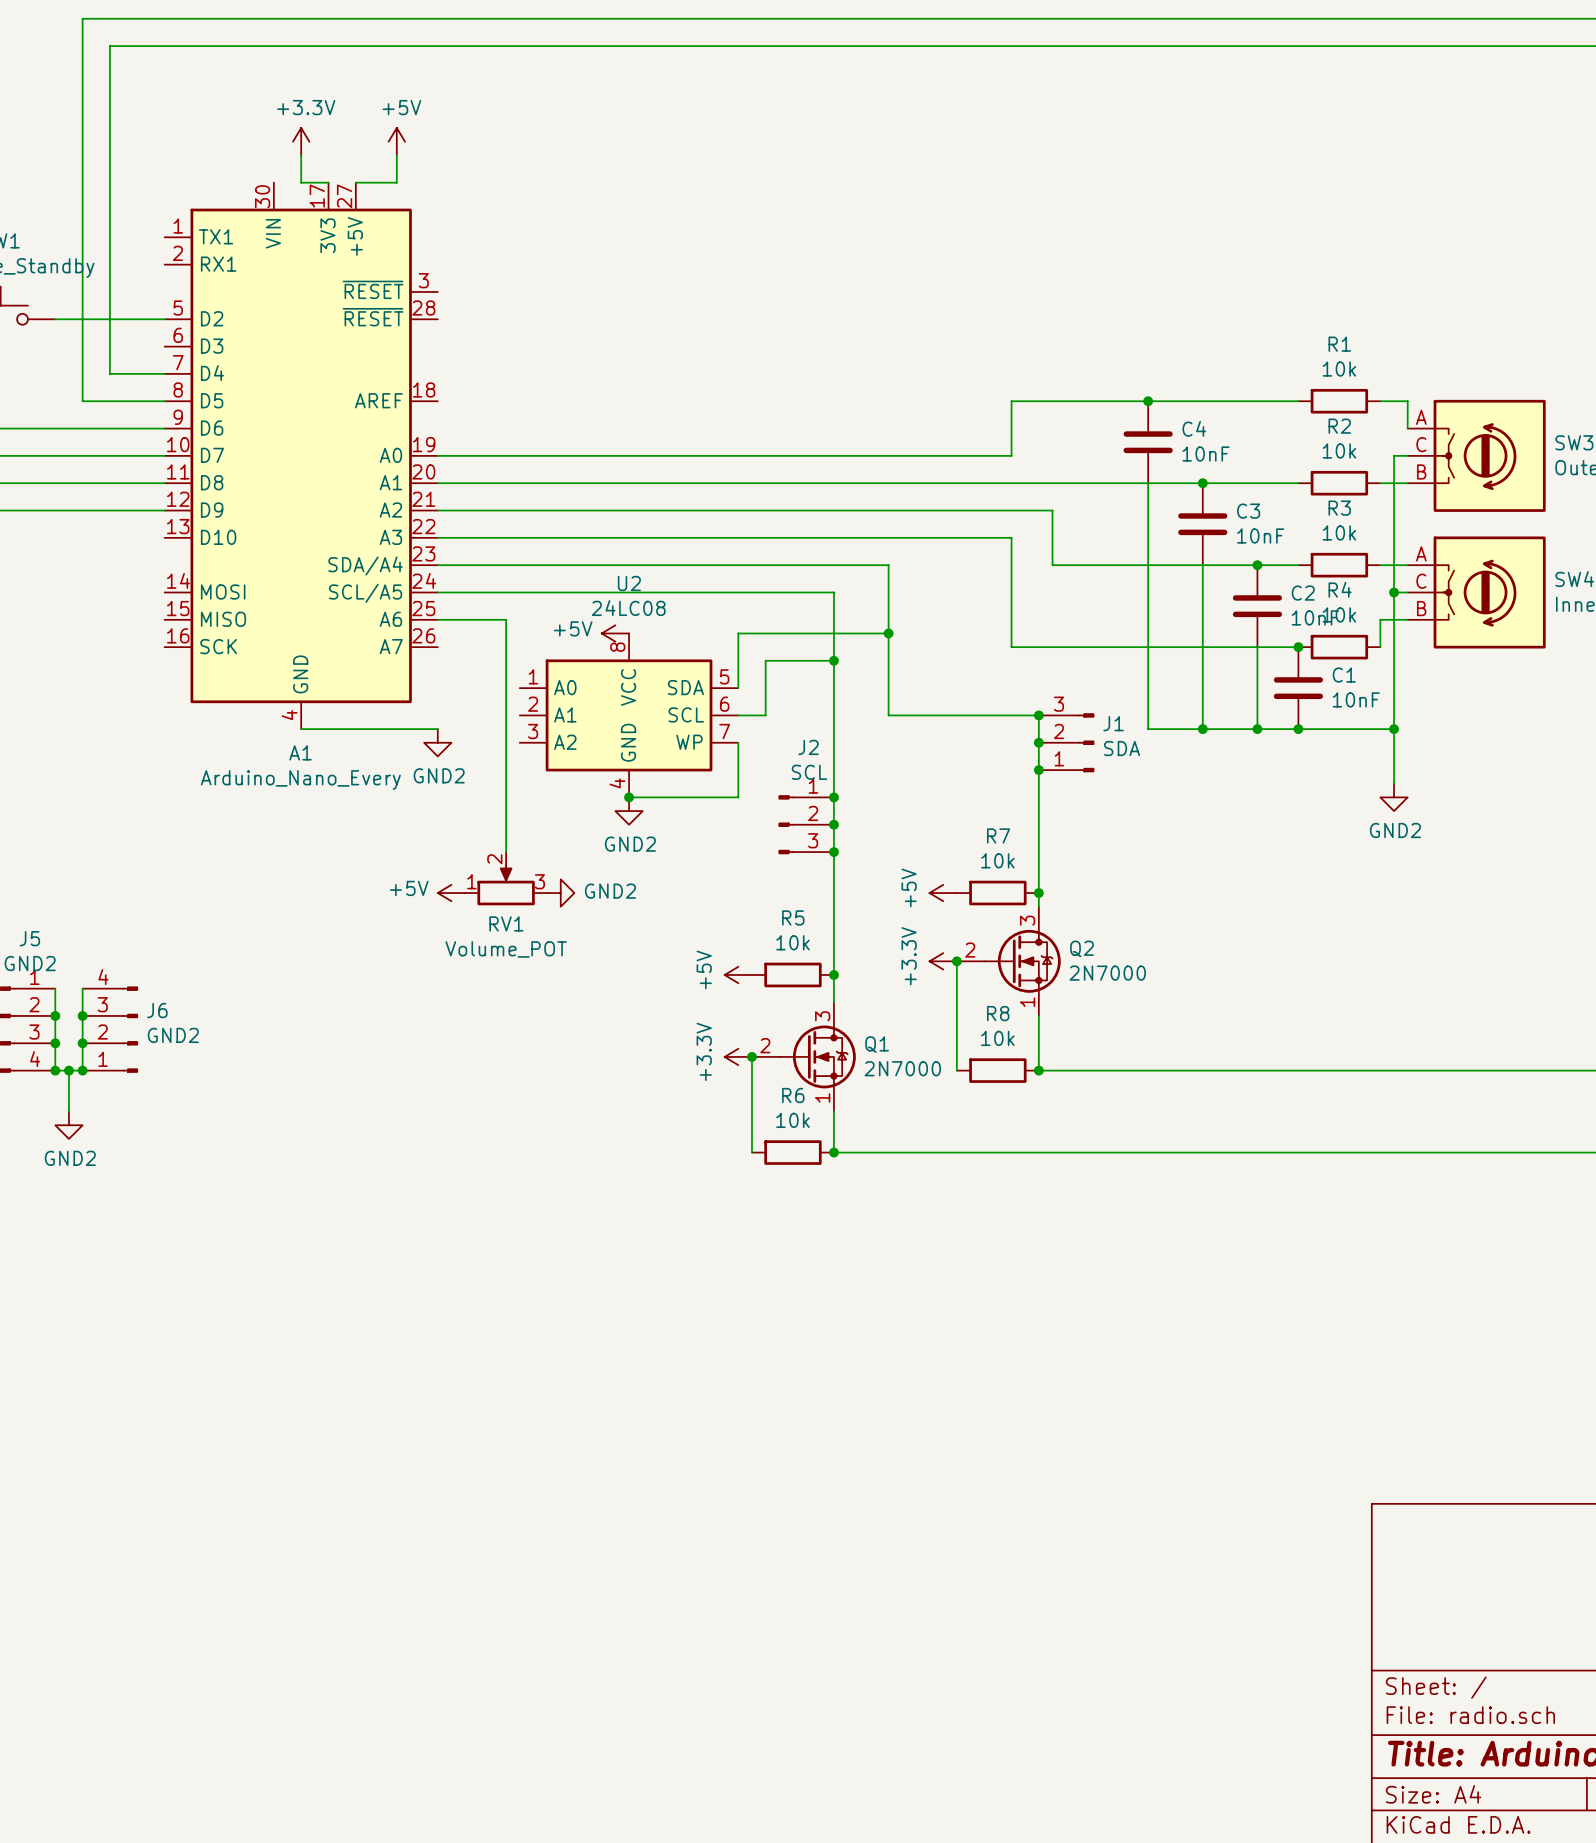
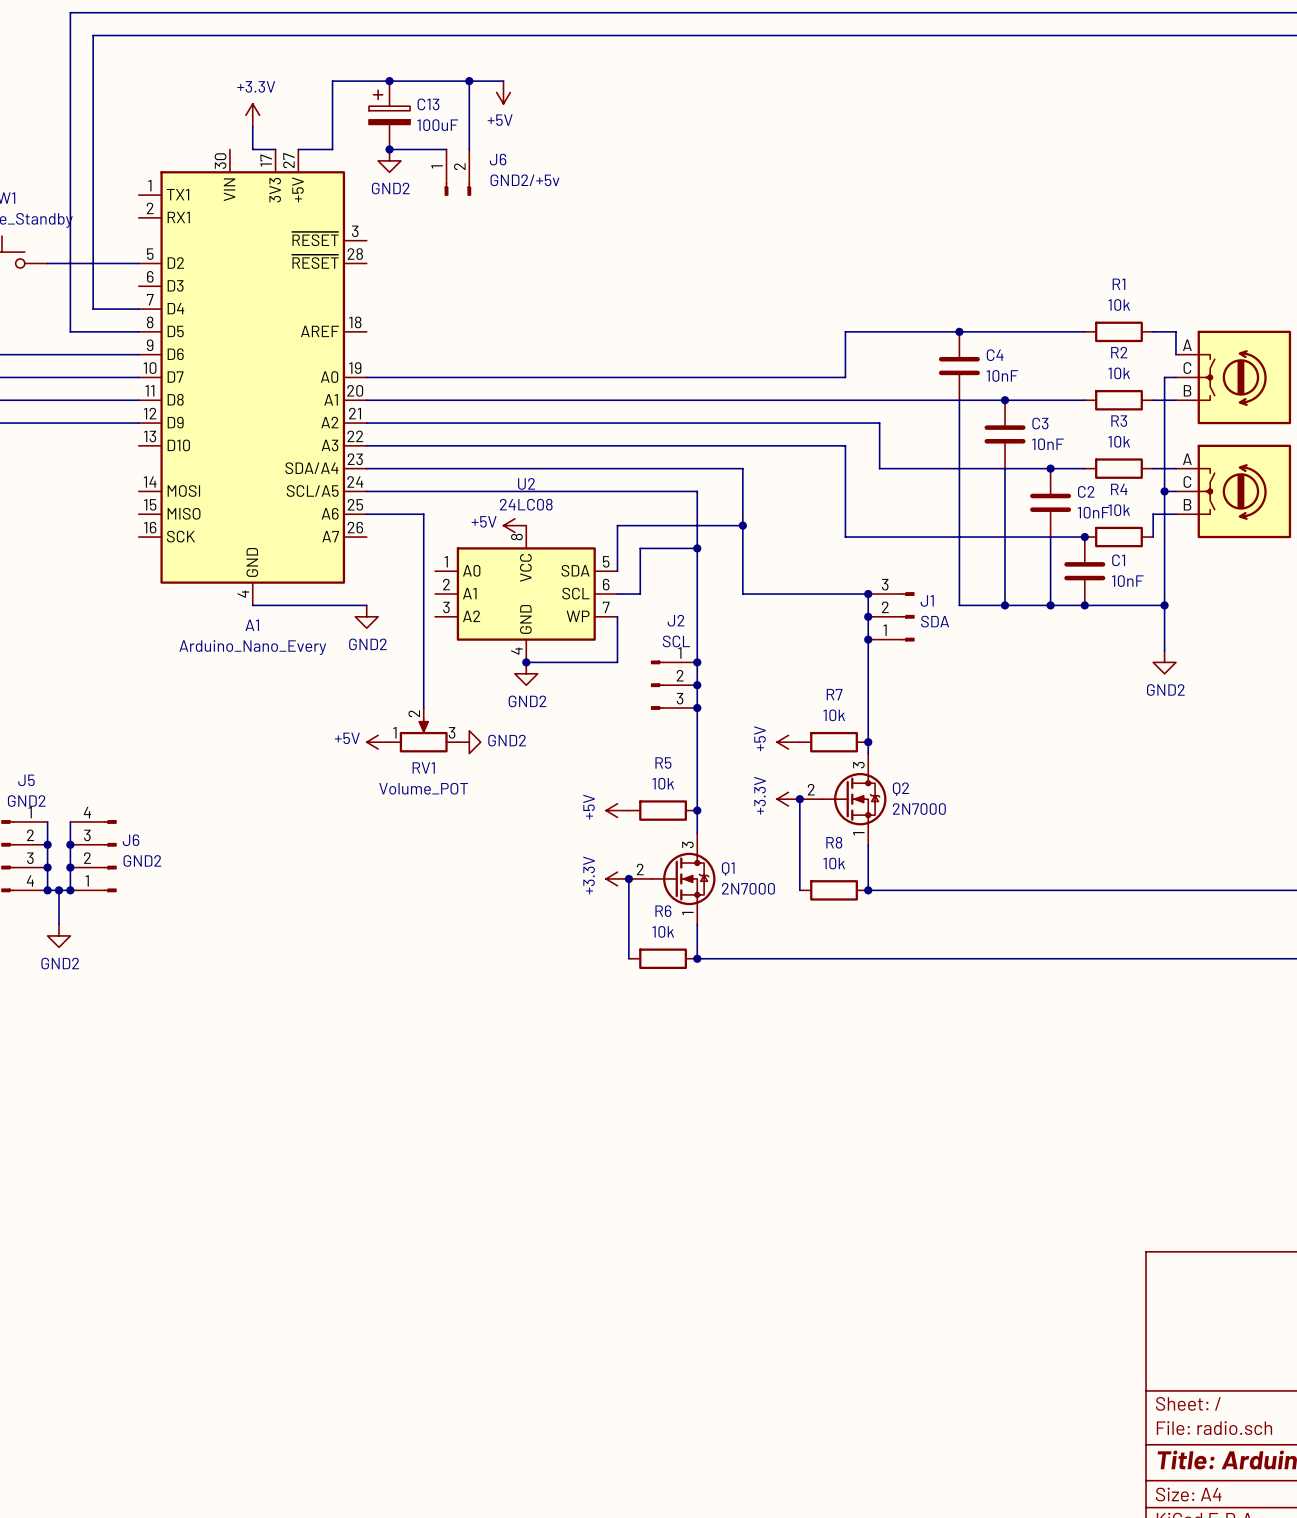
junction: none -> (389, 81)
wire: none -> (469, 81) (469, 149)
junction: none -> (469, 81)
wire: none -> (503, 81) (332, 81) (332, 126)
power symbol rotation: 0° (396, 141) -> 180° (503, 92)
power symbol position: +5V (396, 141) -> +5V (503, 92)
C13: none -> 100uF (389, 115)
wire: none -> (389, 149) (446, 149)
junction: none -> (389, 149)
power symbol: none -> GND2 (389, 160)
J6: none -> GND2/+5v (457, 172)

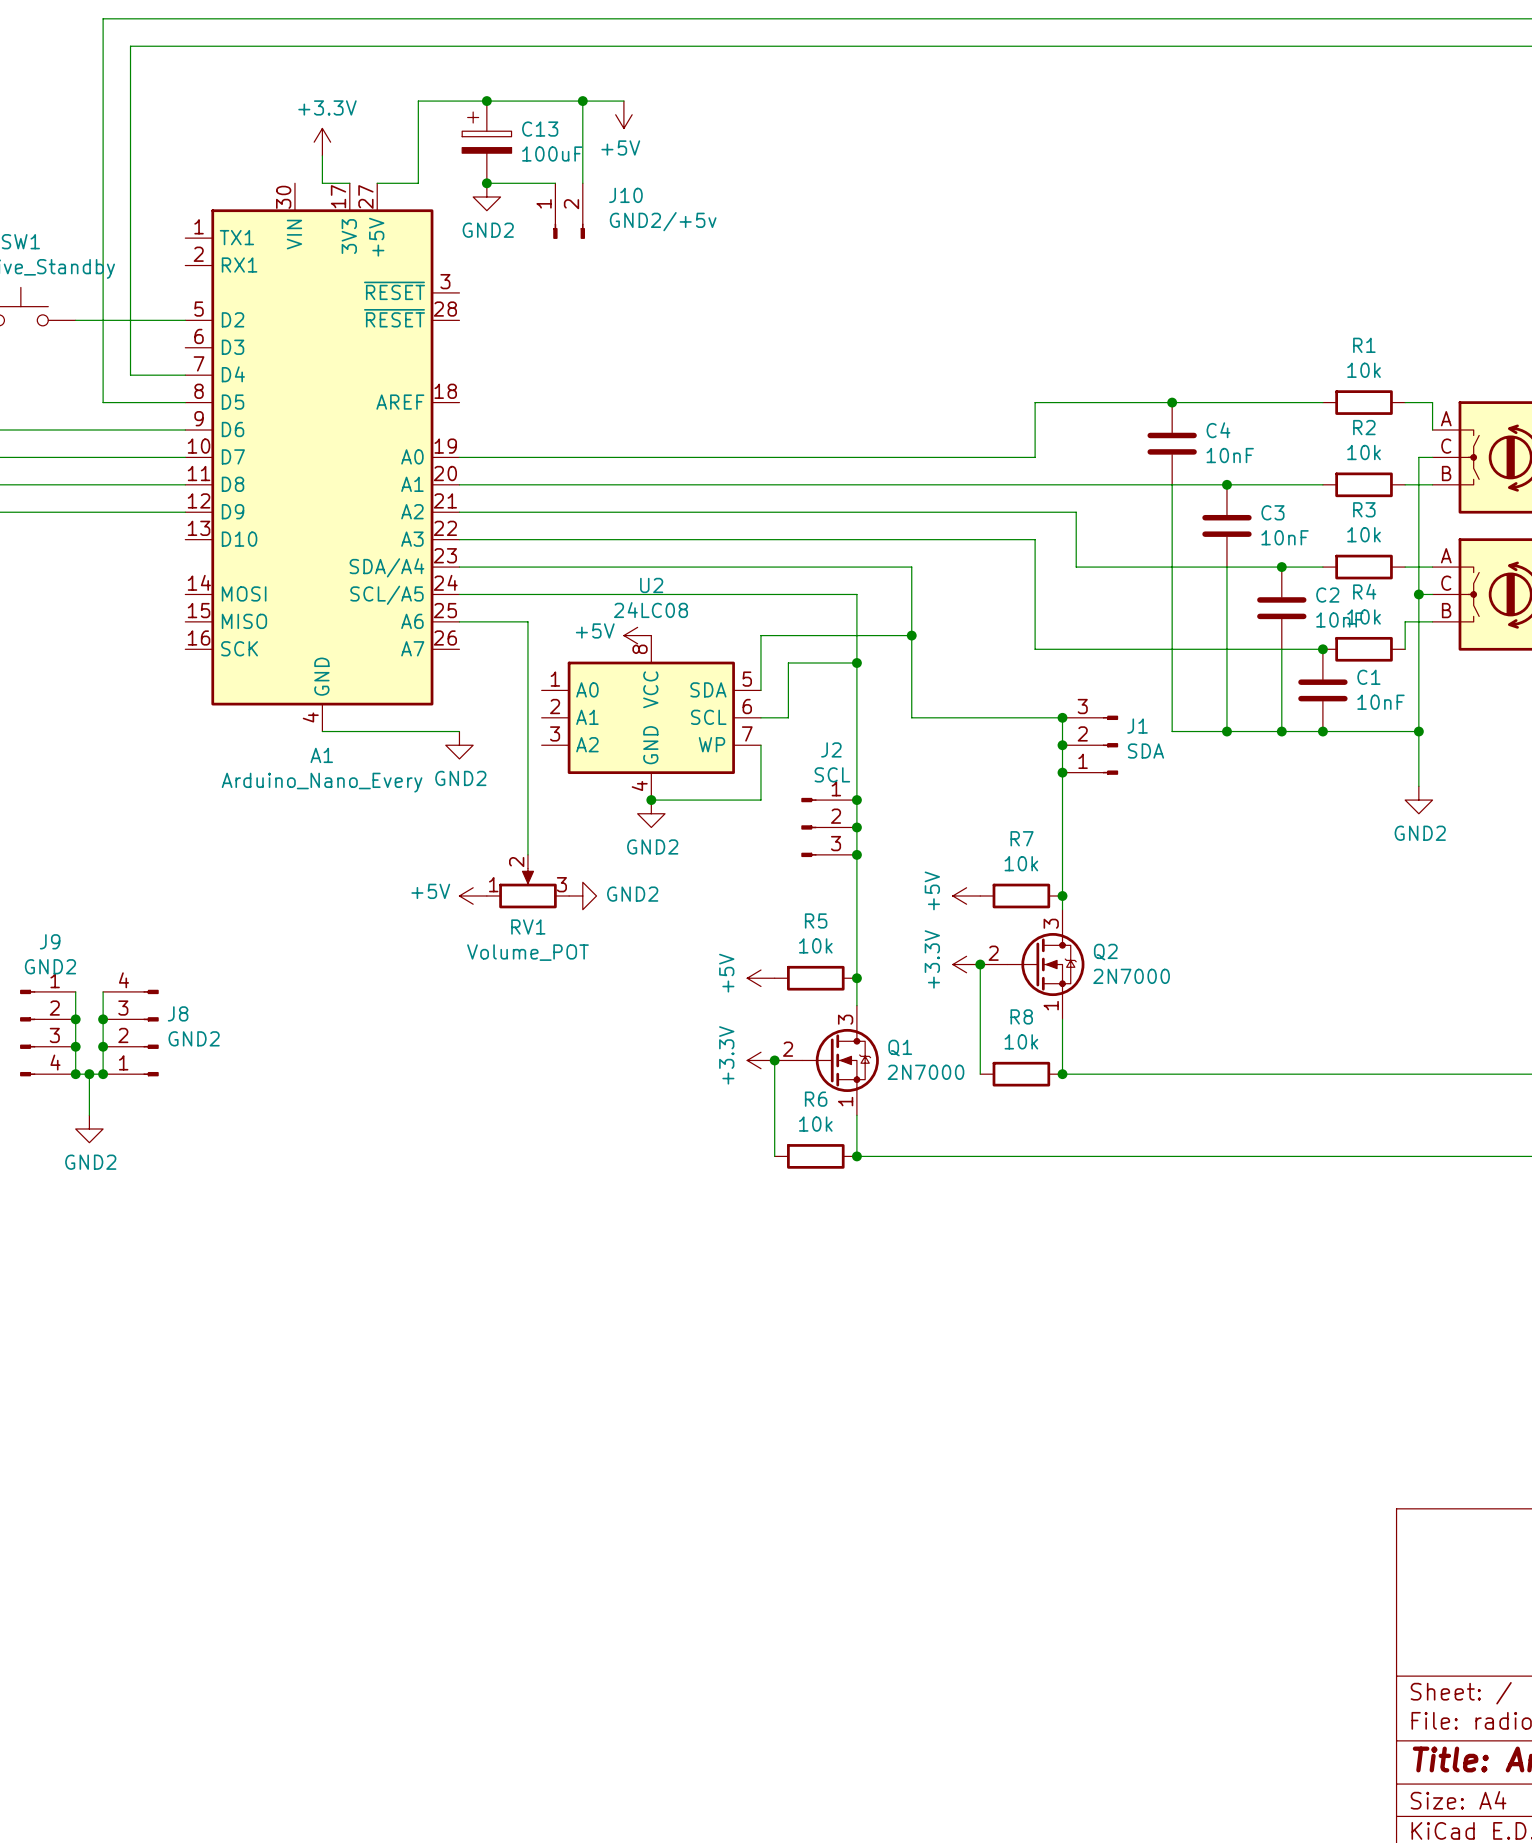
J6 name: J6 (498, 159) -> J10 (625, 195)
J5 name: J5 (26, 780) -> J9 (50, 941)
J6 name: J6 (131, 840) -> J8 (178, 1013)

